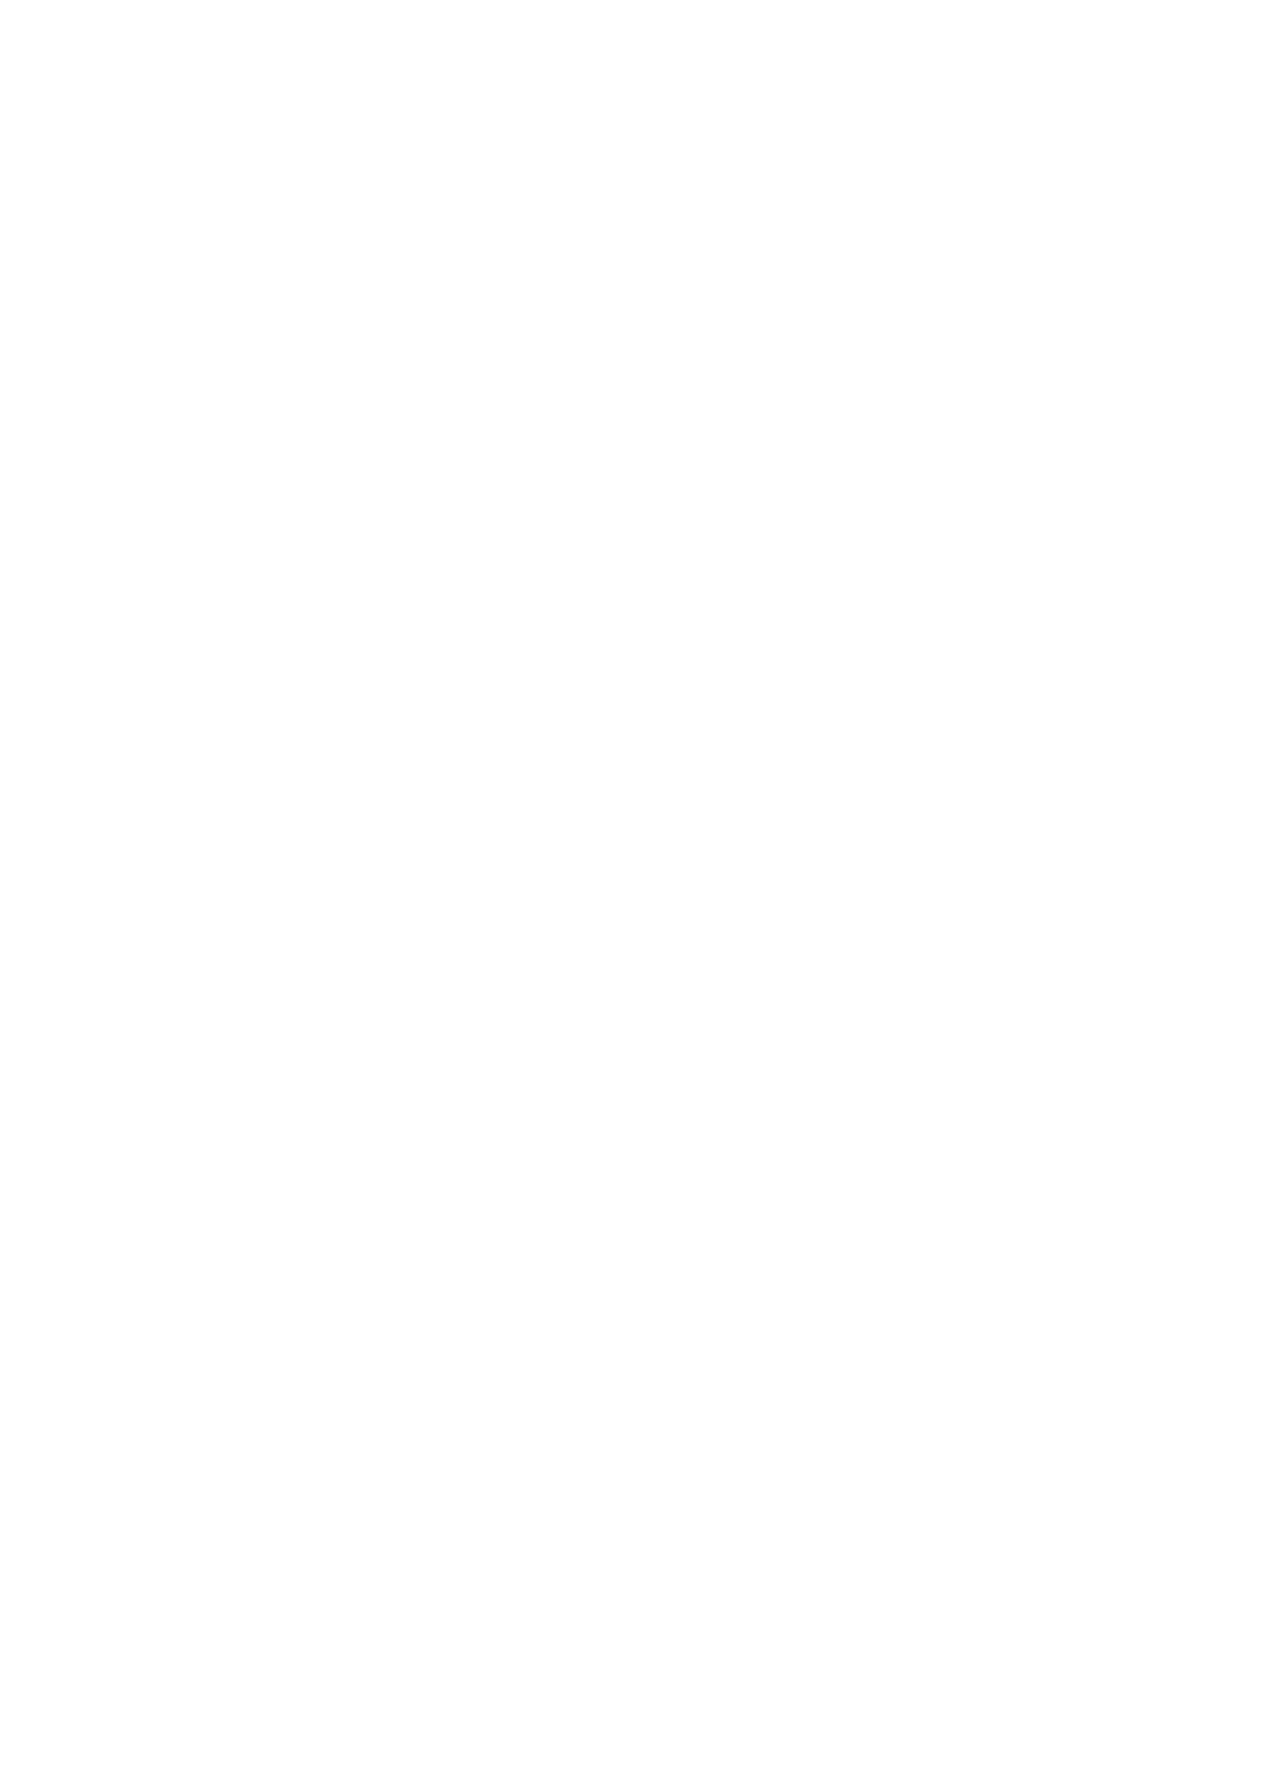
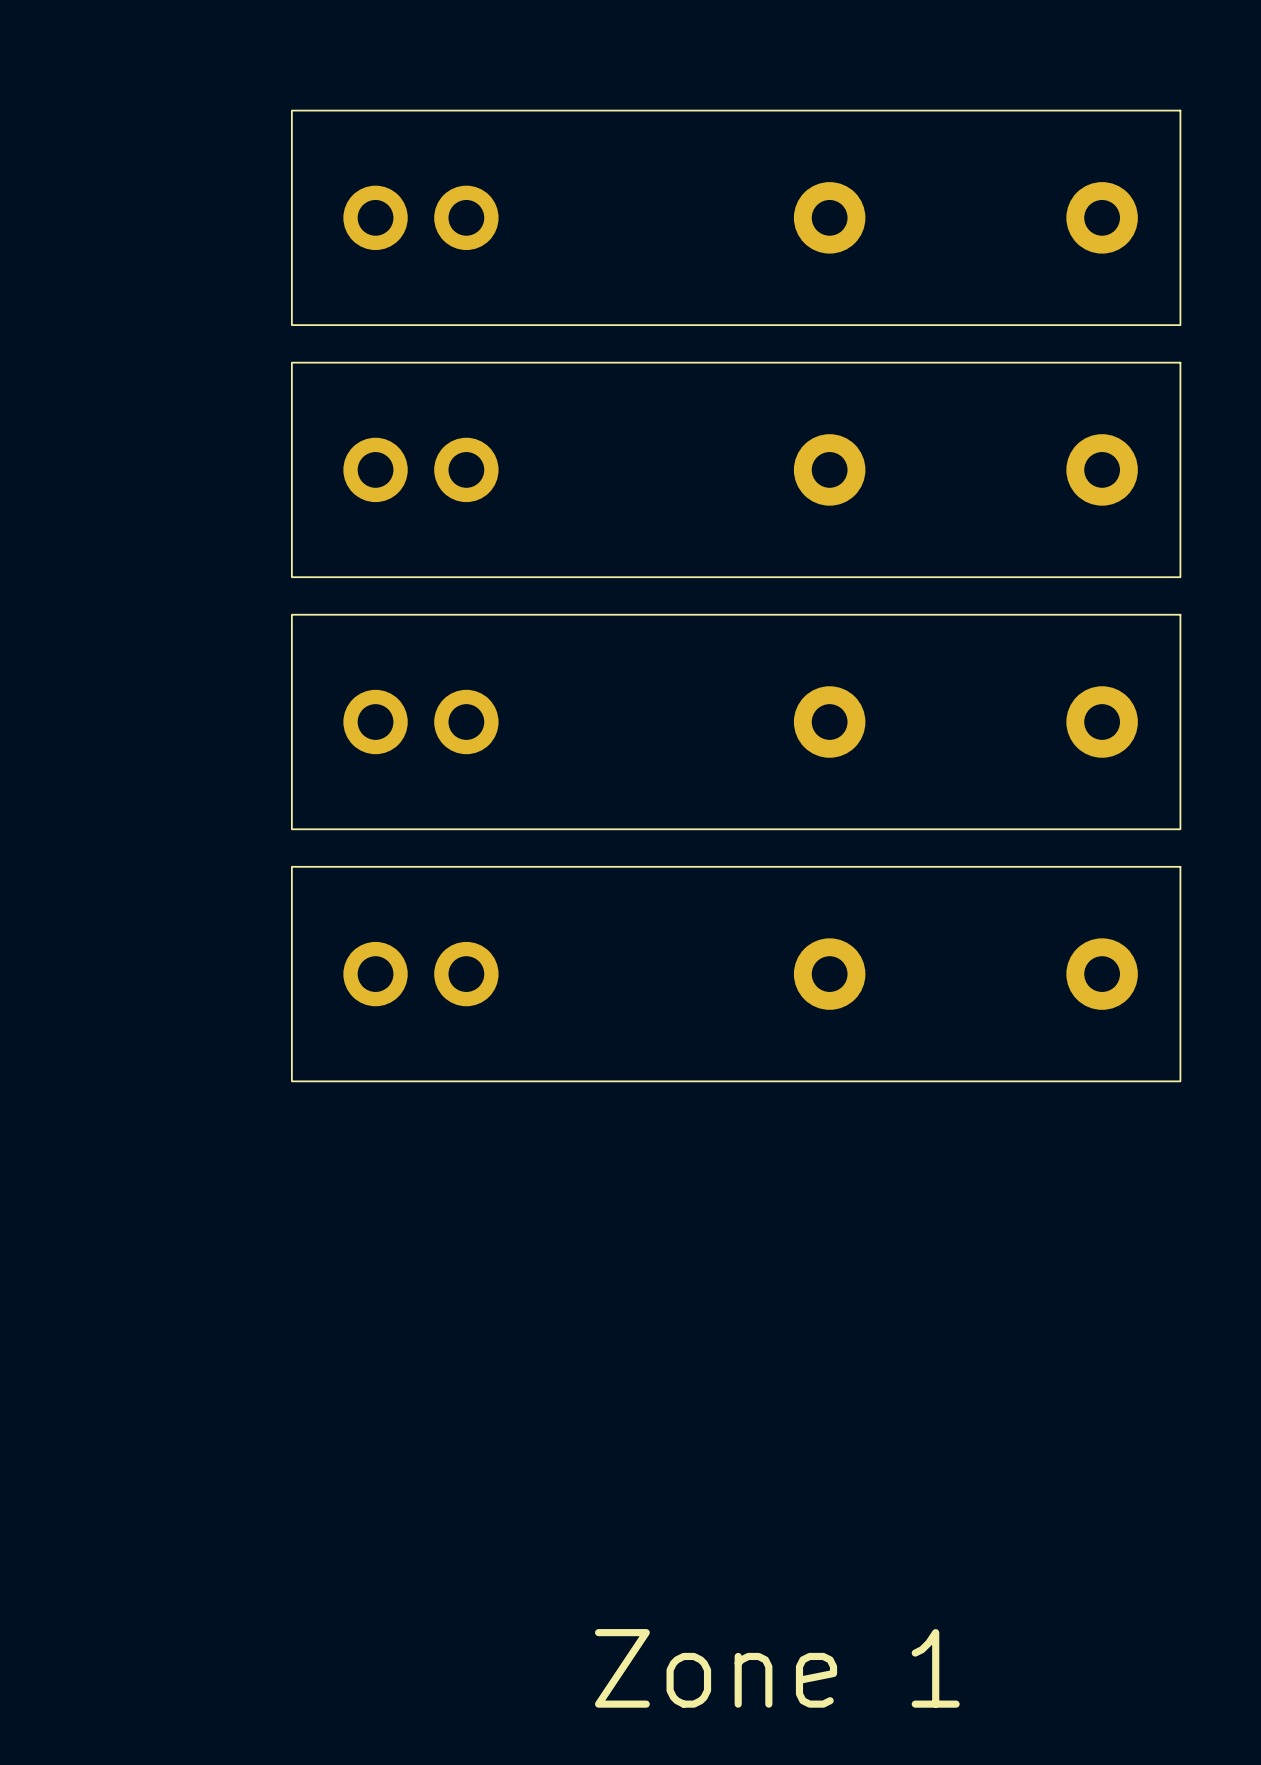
part: none -> (736, 217)
part: none -> (736, 469)
part: none -> (736, 722)
part: none -> (736, 974)
text: none -> Zone 1 (777, 1668)

